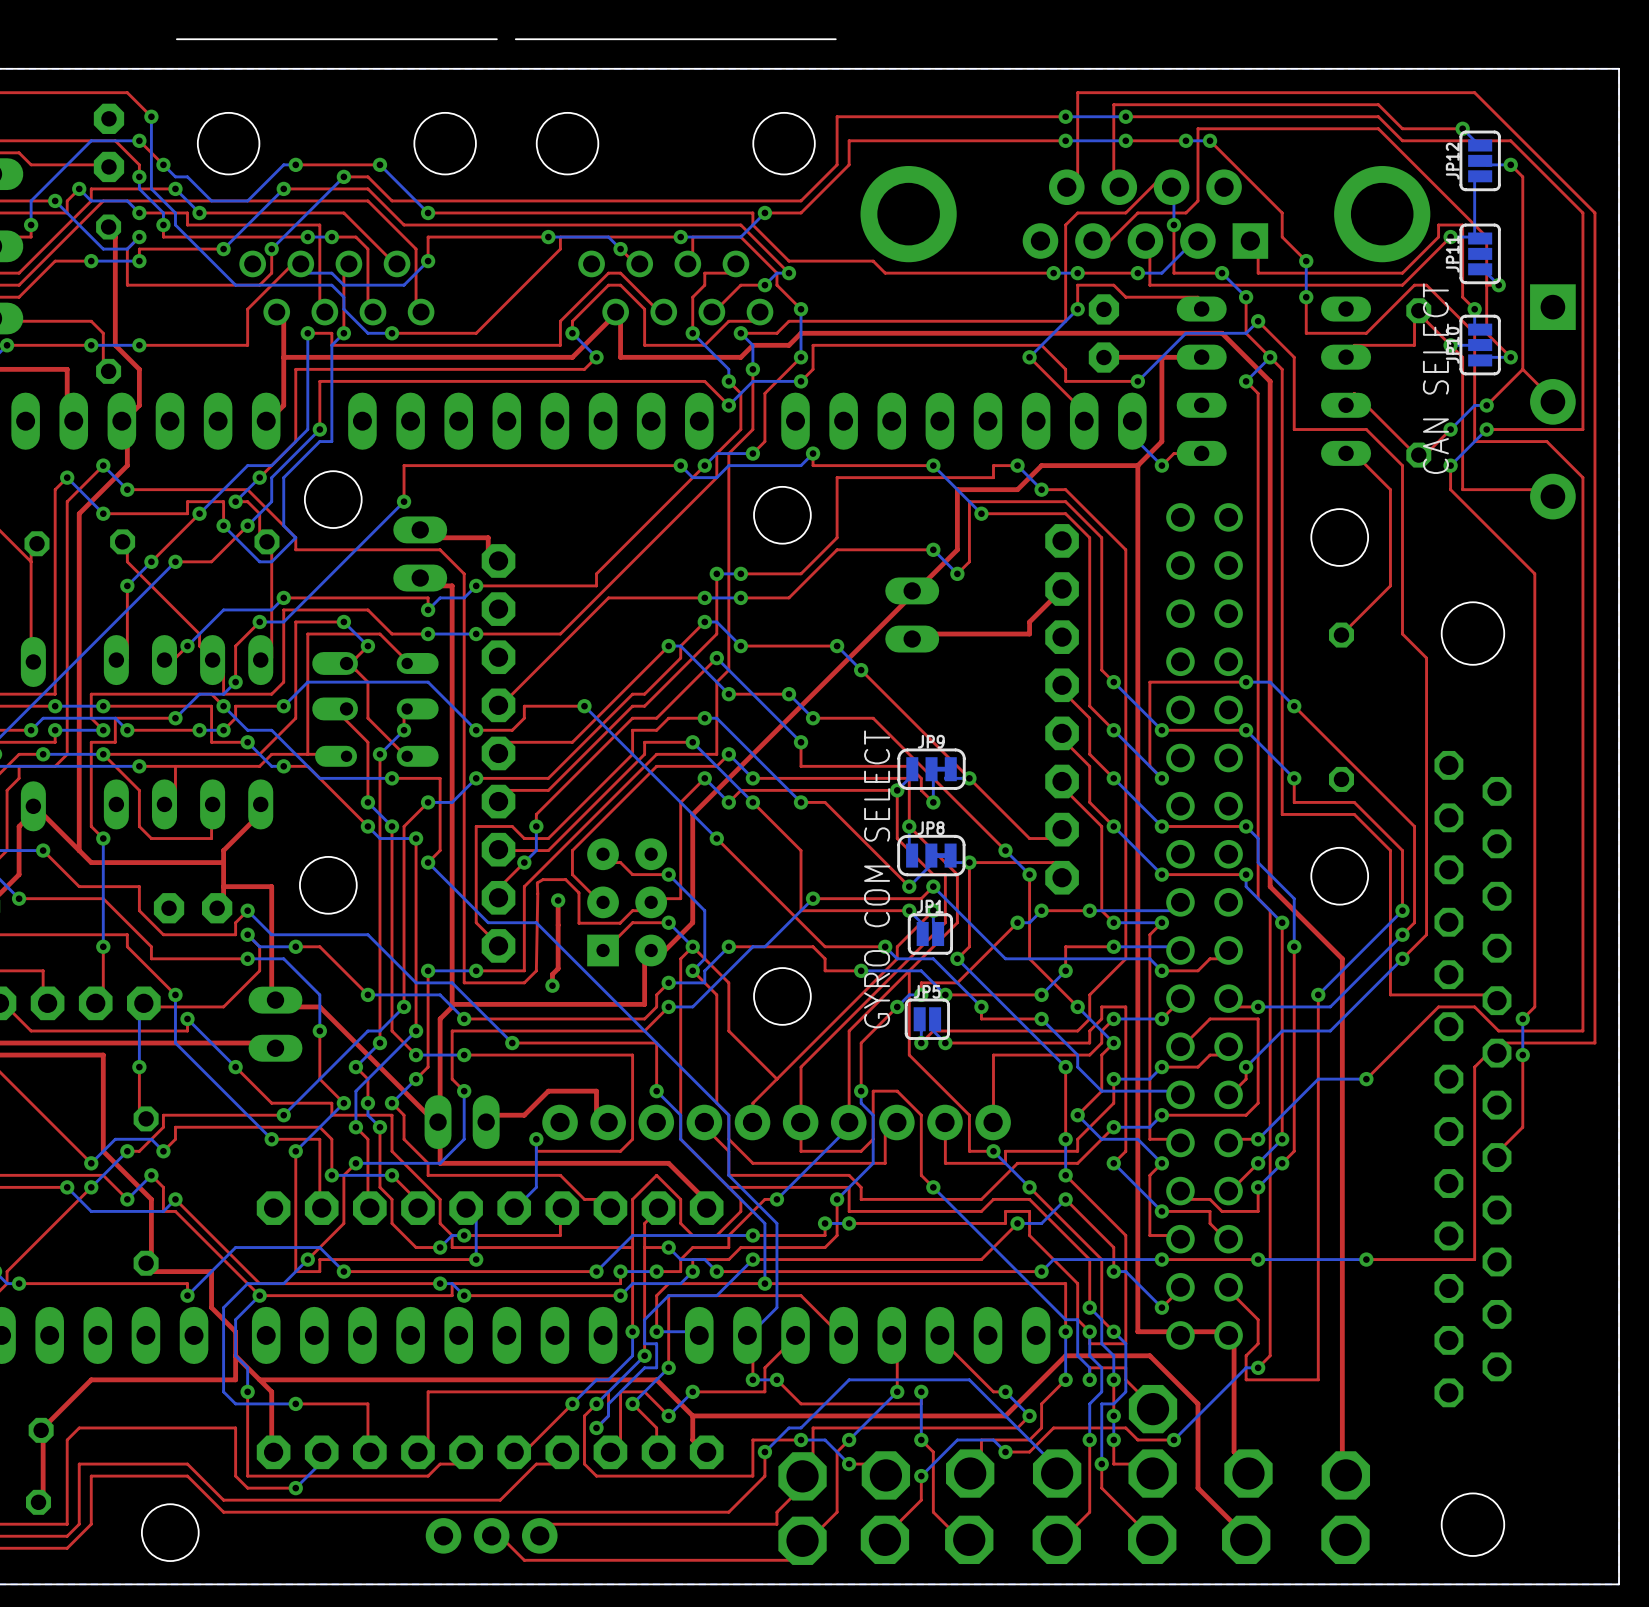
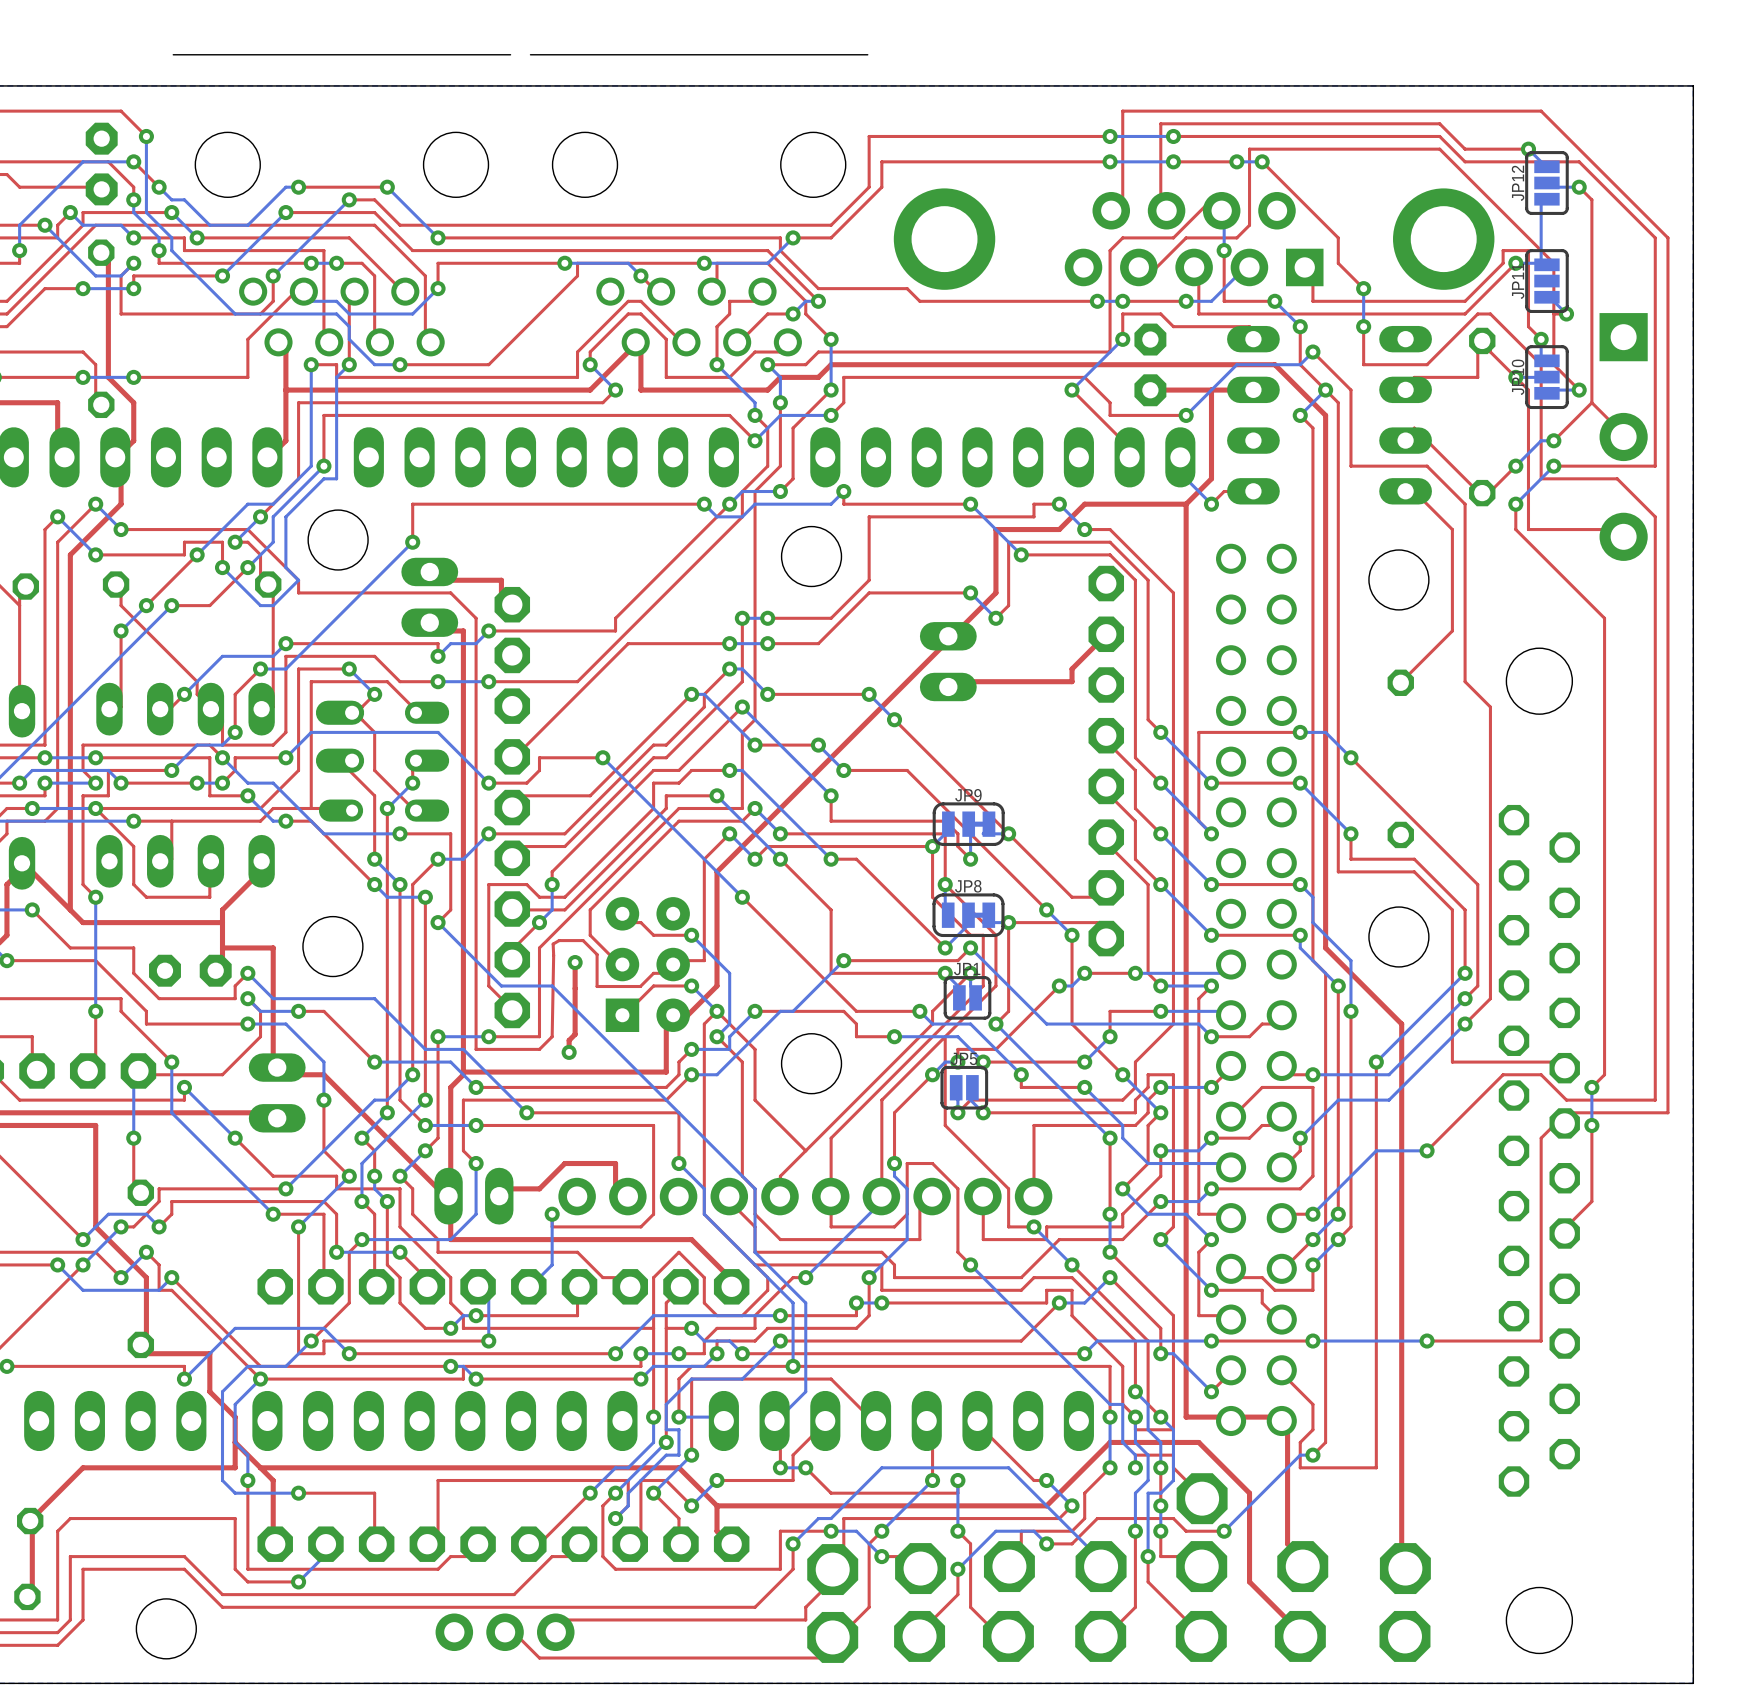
text: CAN SELECT (1435, 378) -> none
text: GYRO COM SELECT (877, 879) -> none

